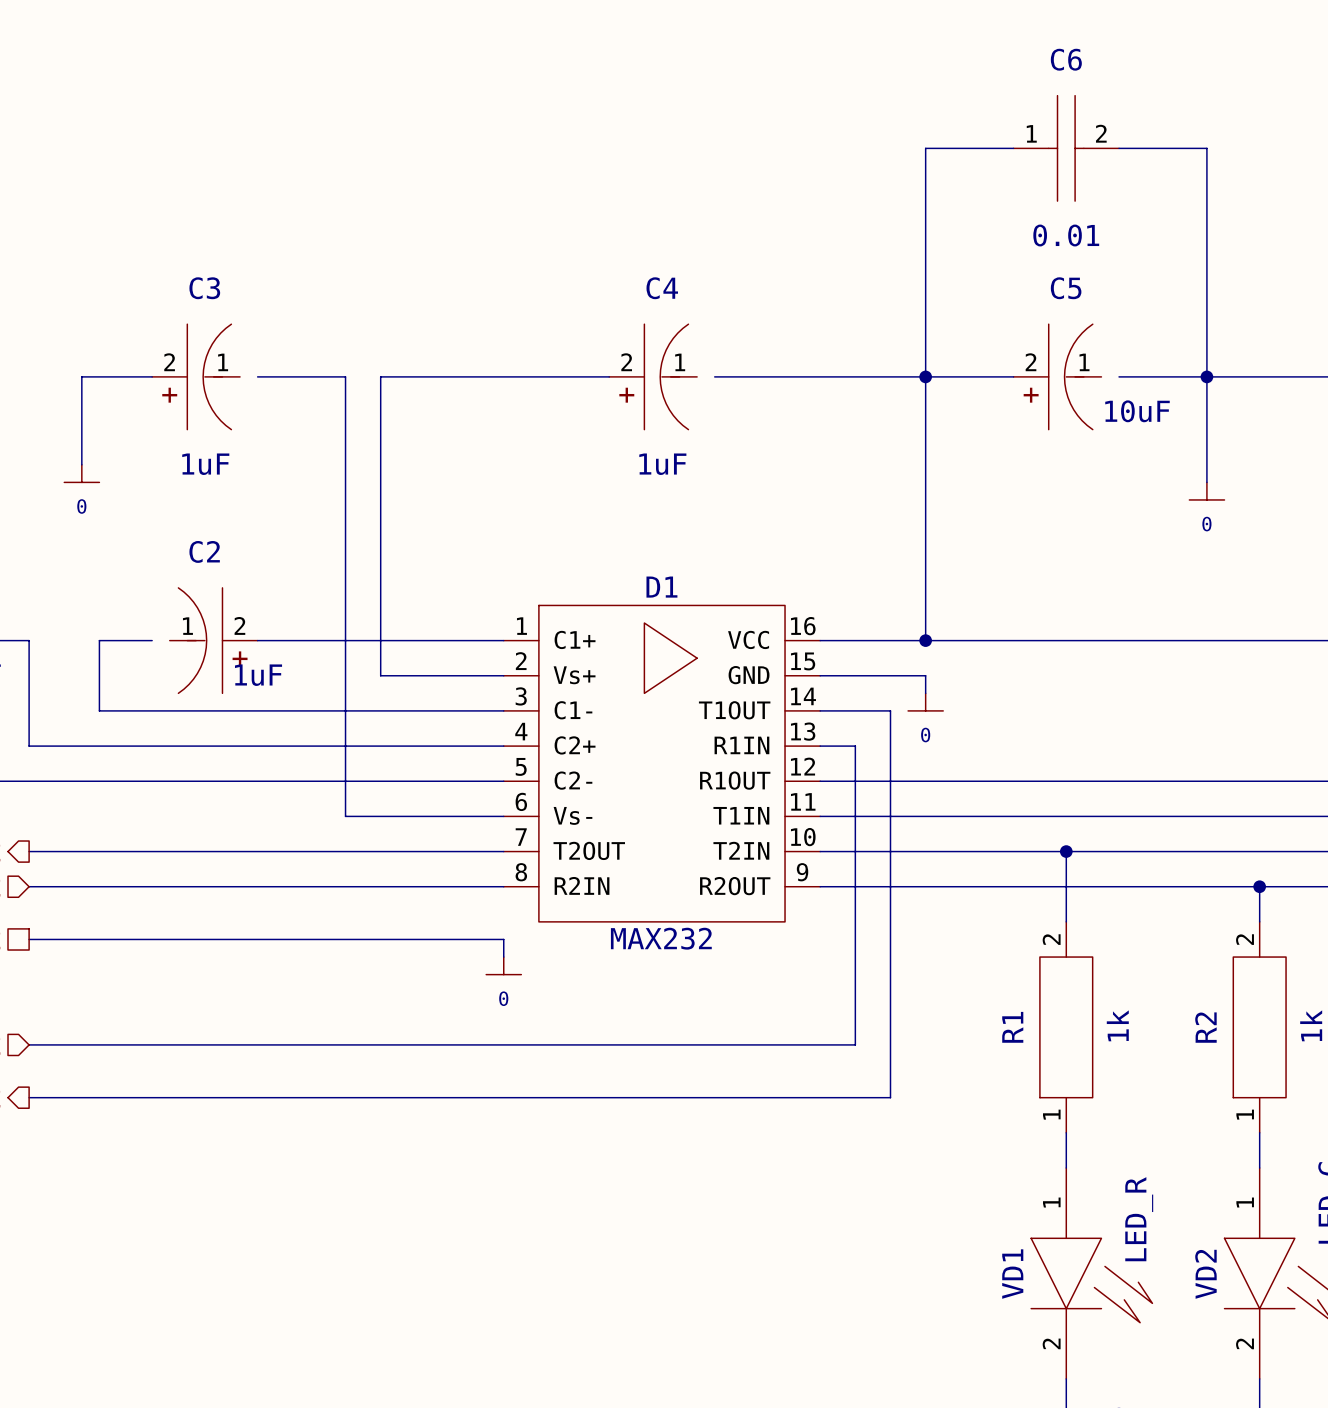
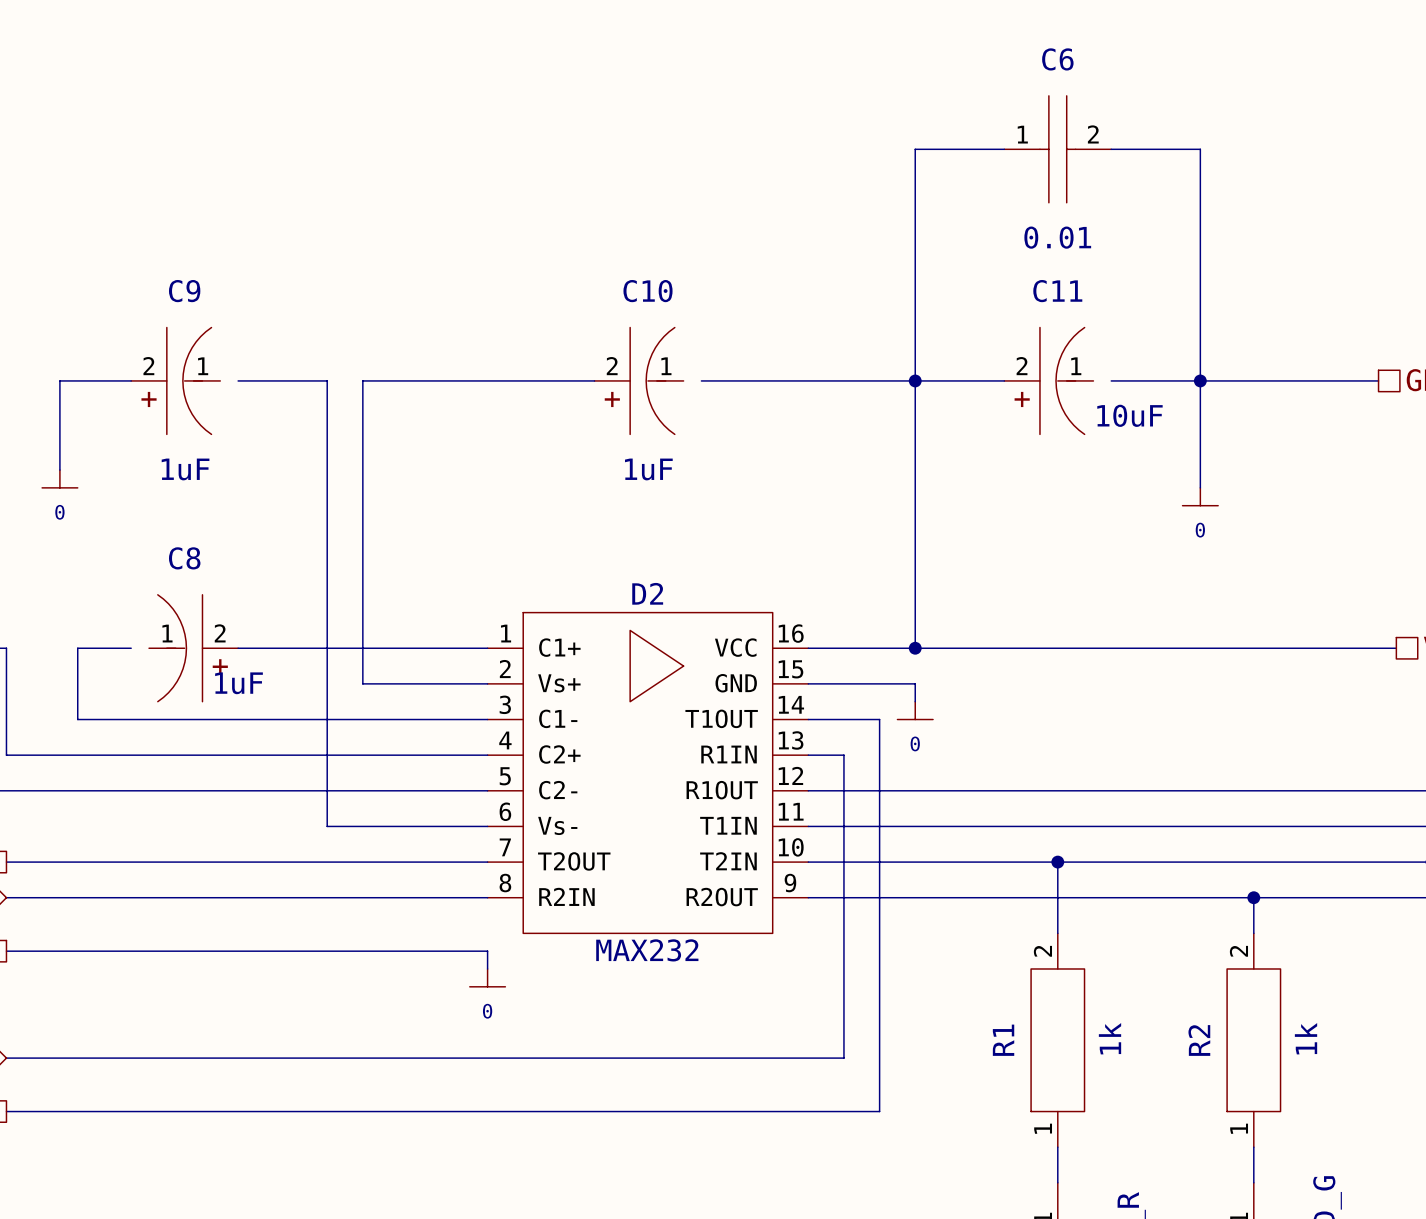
C3 name: C3 (204, 288) -> C9 (184, 291)
C4 name: C4 (662, 288) -> C10 (648, 291)
C5 name: C5 (1066, 288) -> C11 (1057, 291)
C2 name: C2 (204, 551) -> C8 (184, 558)
D1 name: D1 (661, 587) -> D2 (647, 593)

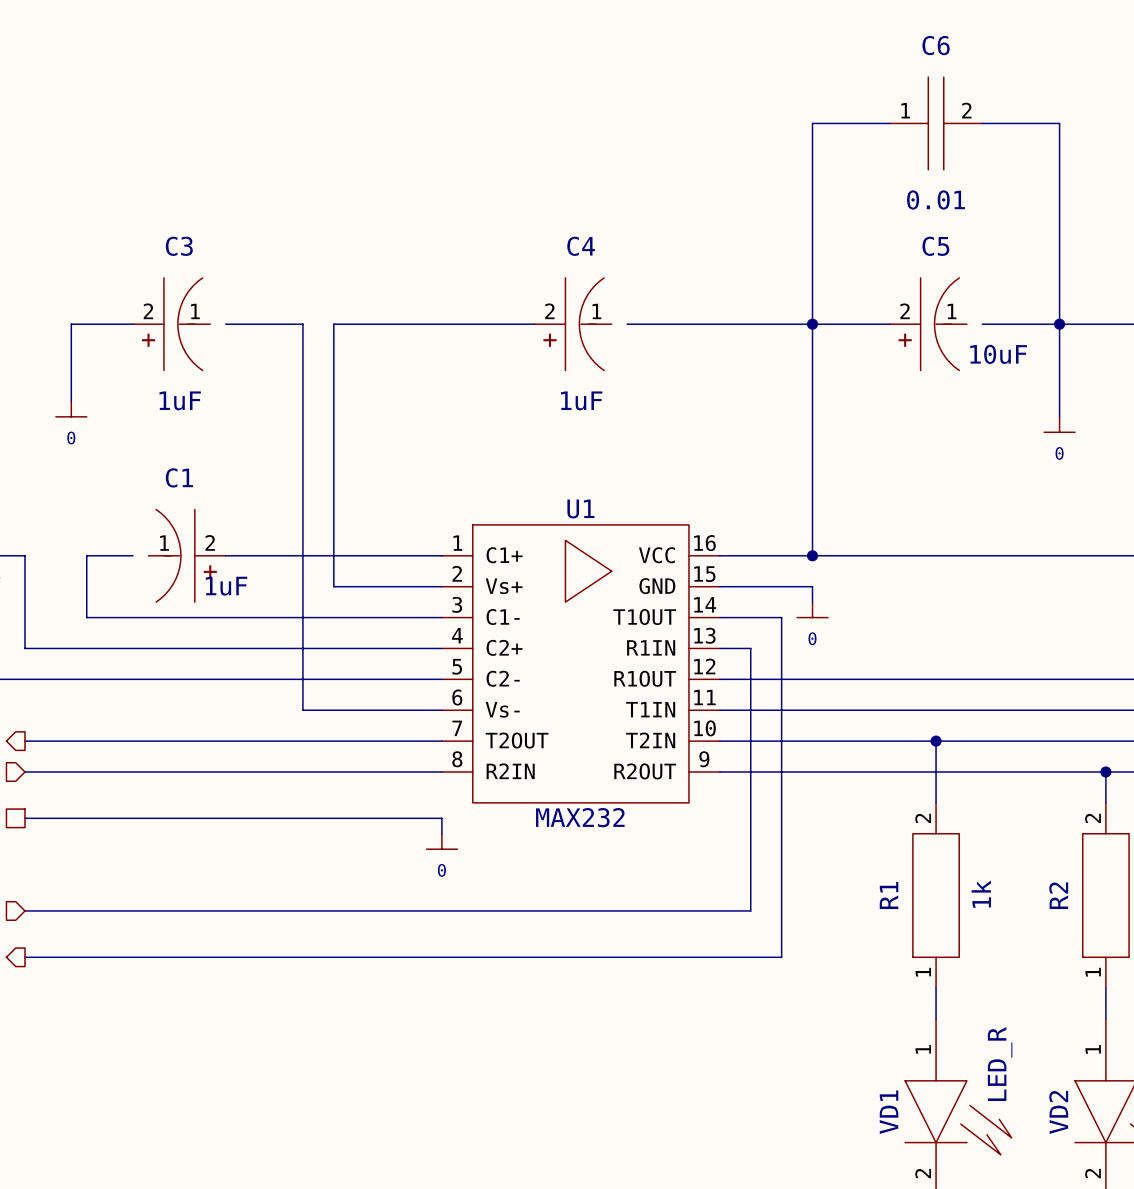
C9 name: C9 (184, 291) -> C3 (179, 246)
C10 name: C10 (648, 291) -> C4 (581, 246)
C11 name: C11 (1057, 291) -> C5 (935, 246)
C8 name: C8 (184, 558) -> C1 (179, 477)
D2 name: D2 (647, 593) -> U1 (580, 508)

